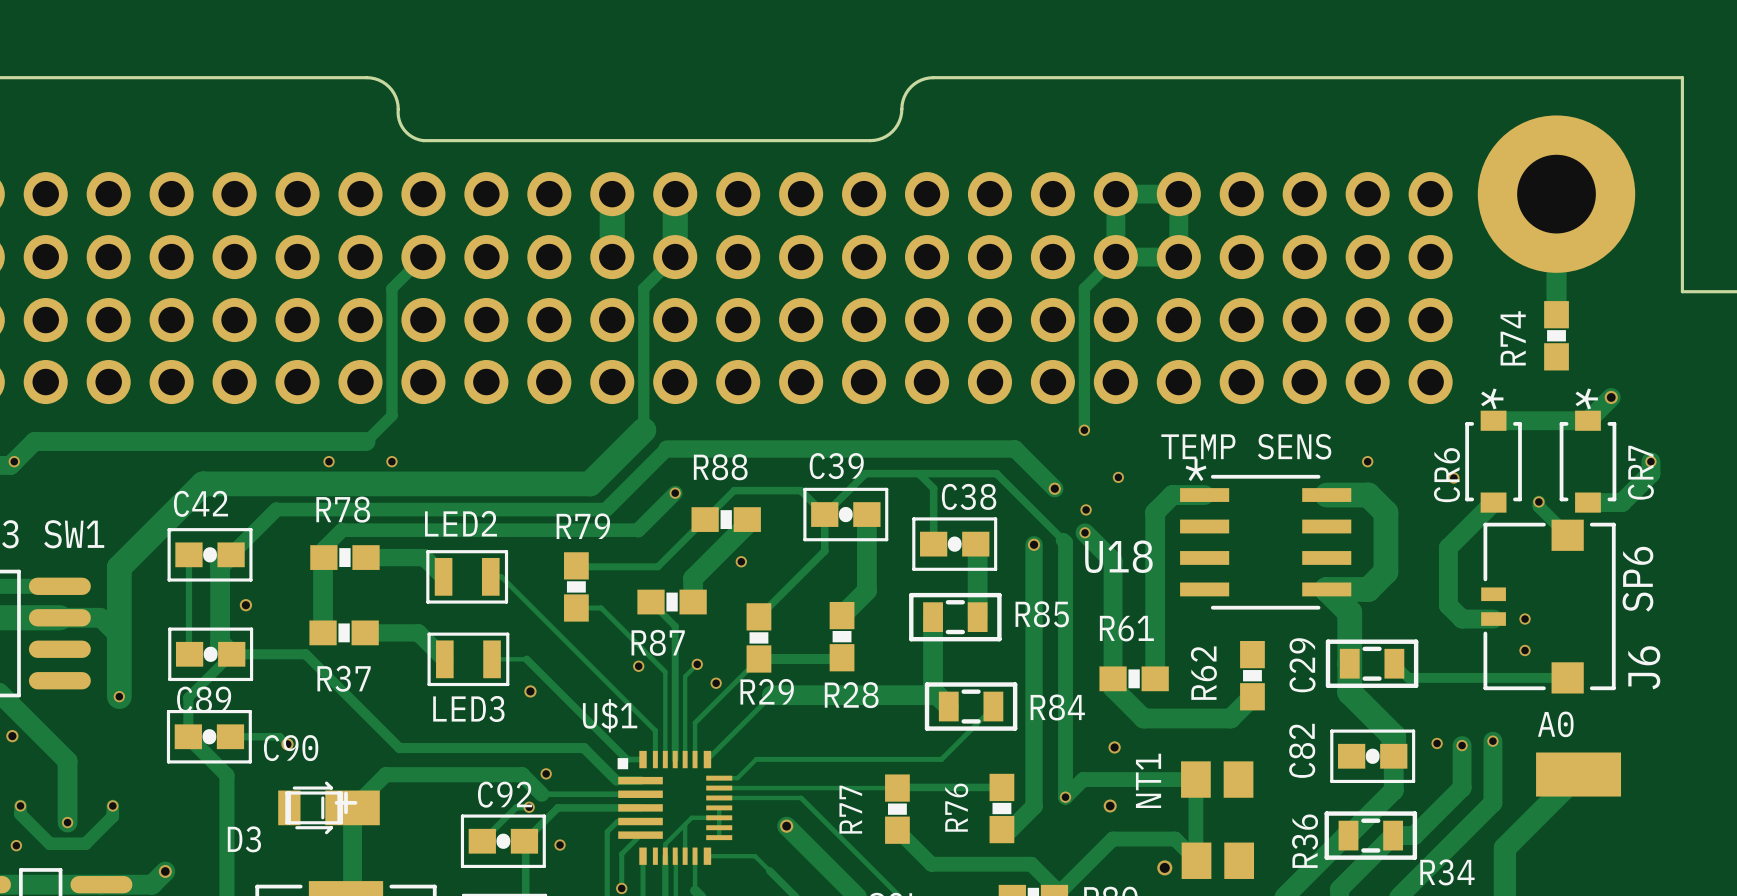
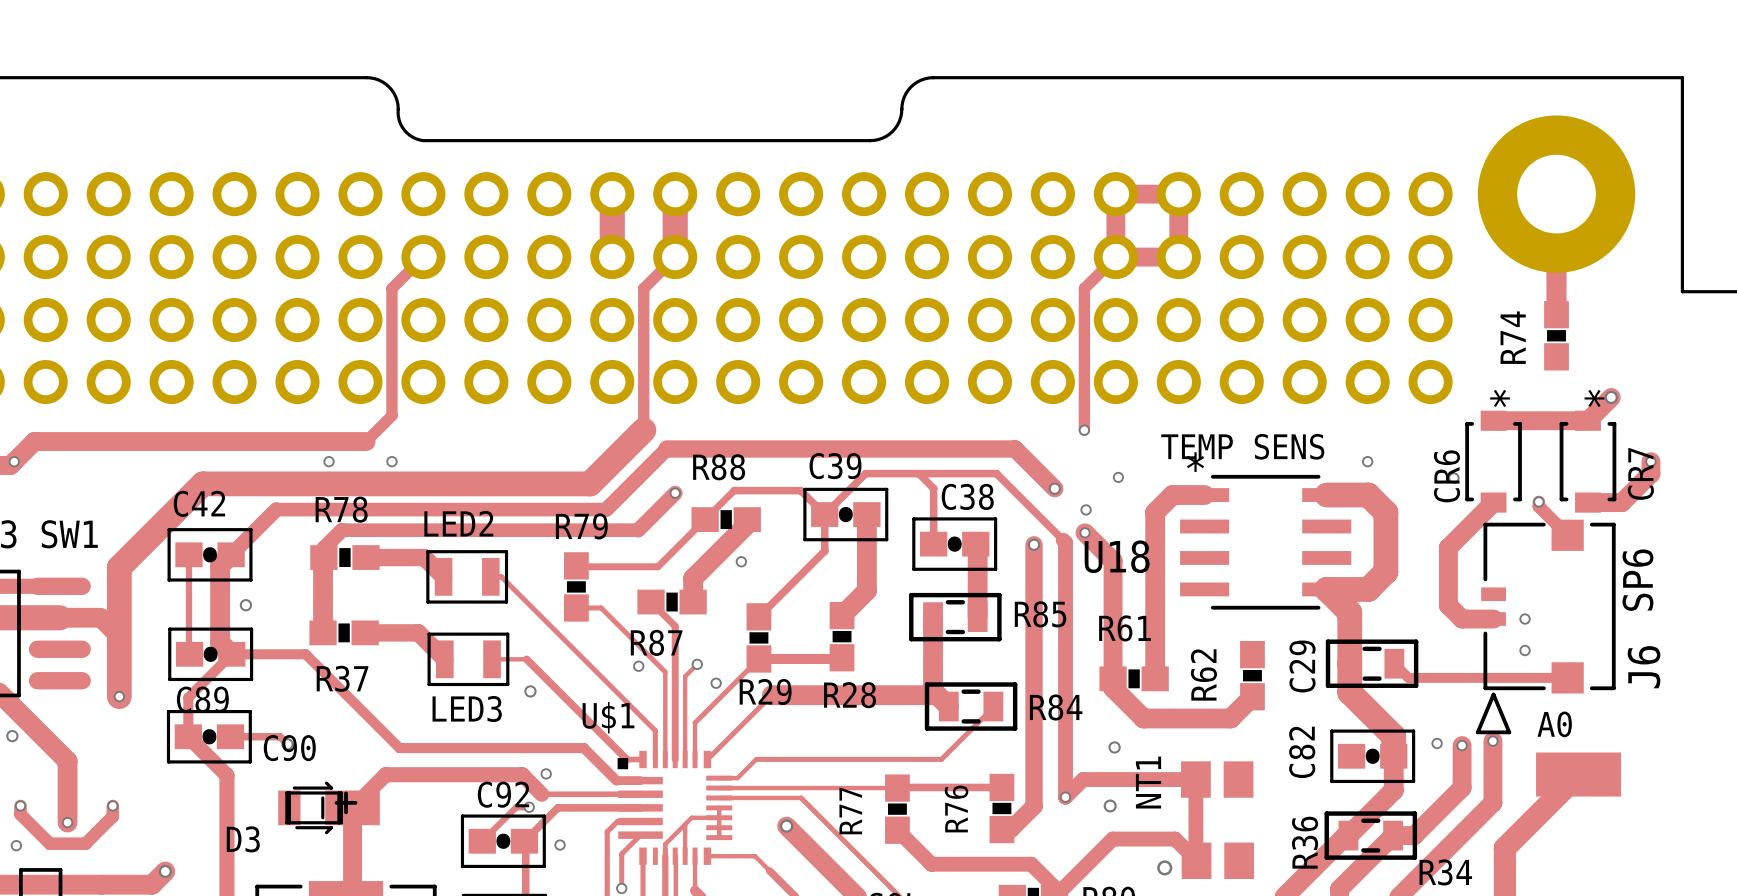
J6 footprint: [1481, 519, 1616, 694] -> [1475, 519, 1616, 735]

